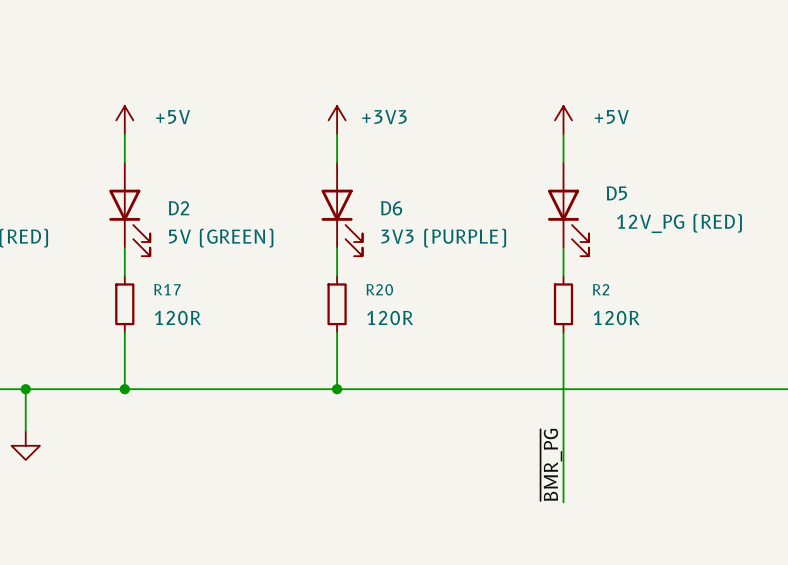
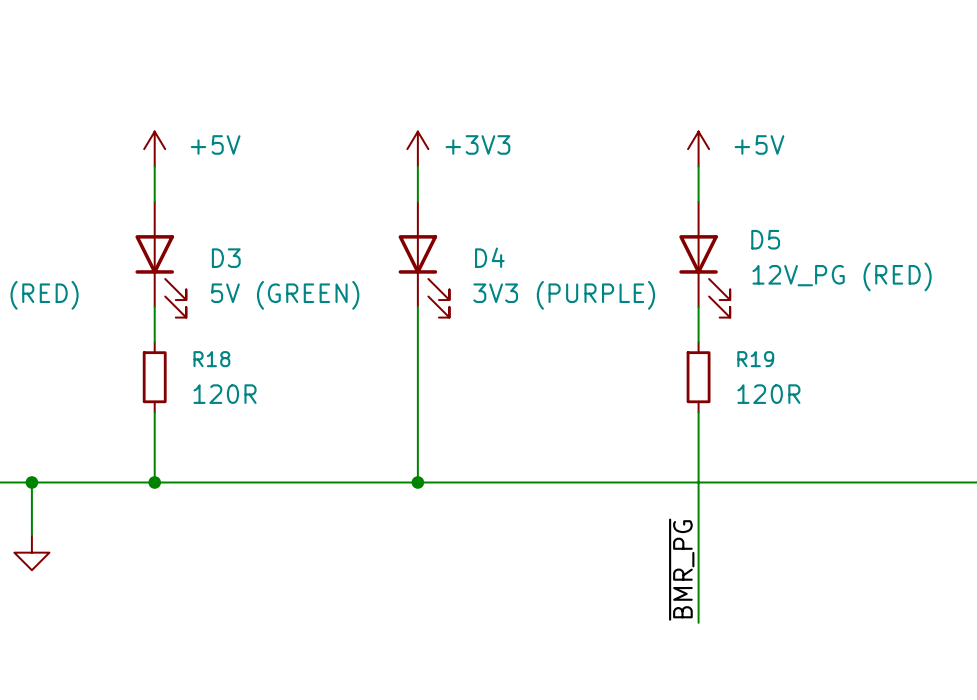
D2 name: D2 (179, 208) -> D3 (226, 258)
D6 name: D6 (391, 208) -> D4 (489, 257)
wire: none -> (417, 342) (417, 412)
R17 name: R17 (167, 289) -> R18 (211, 359)
R2 name: R2 (601, 289) -> R19 (755, 359)
R20: 120R (337, 304) -> none

